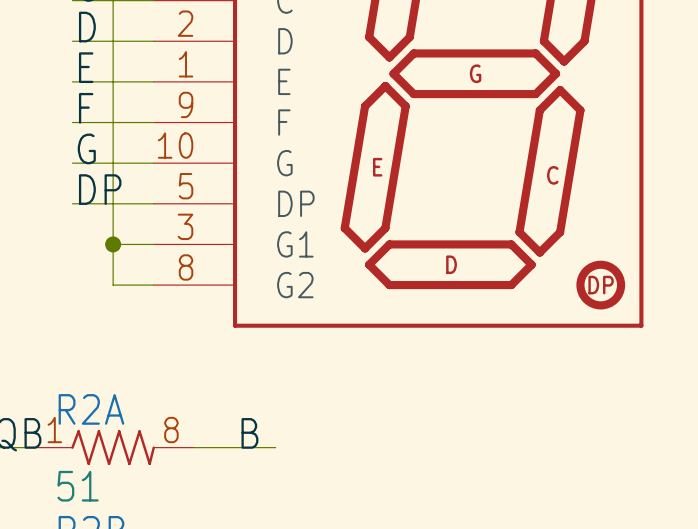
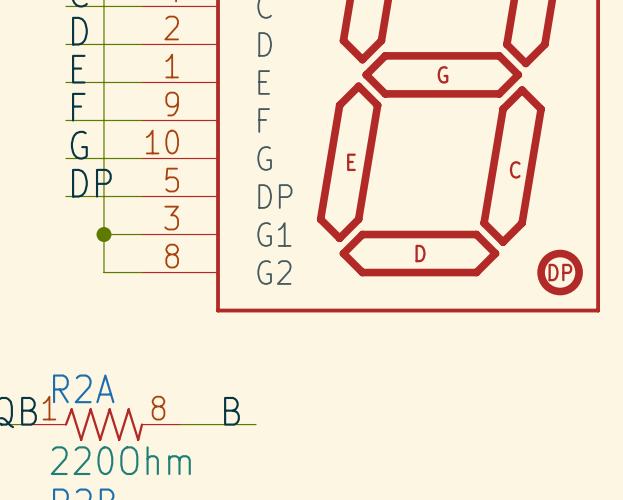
R2A value: 51 (78, 486) -> 220Ohm (120, 460)

